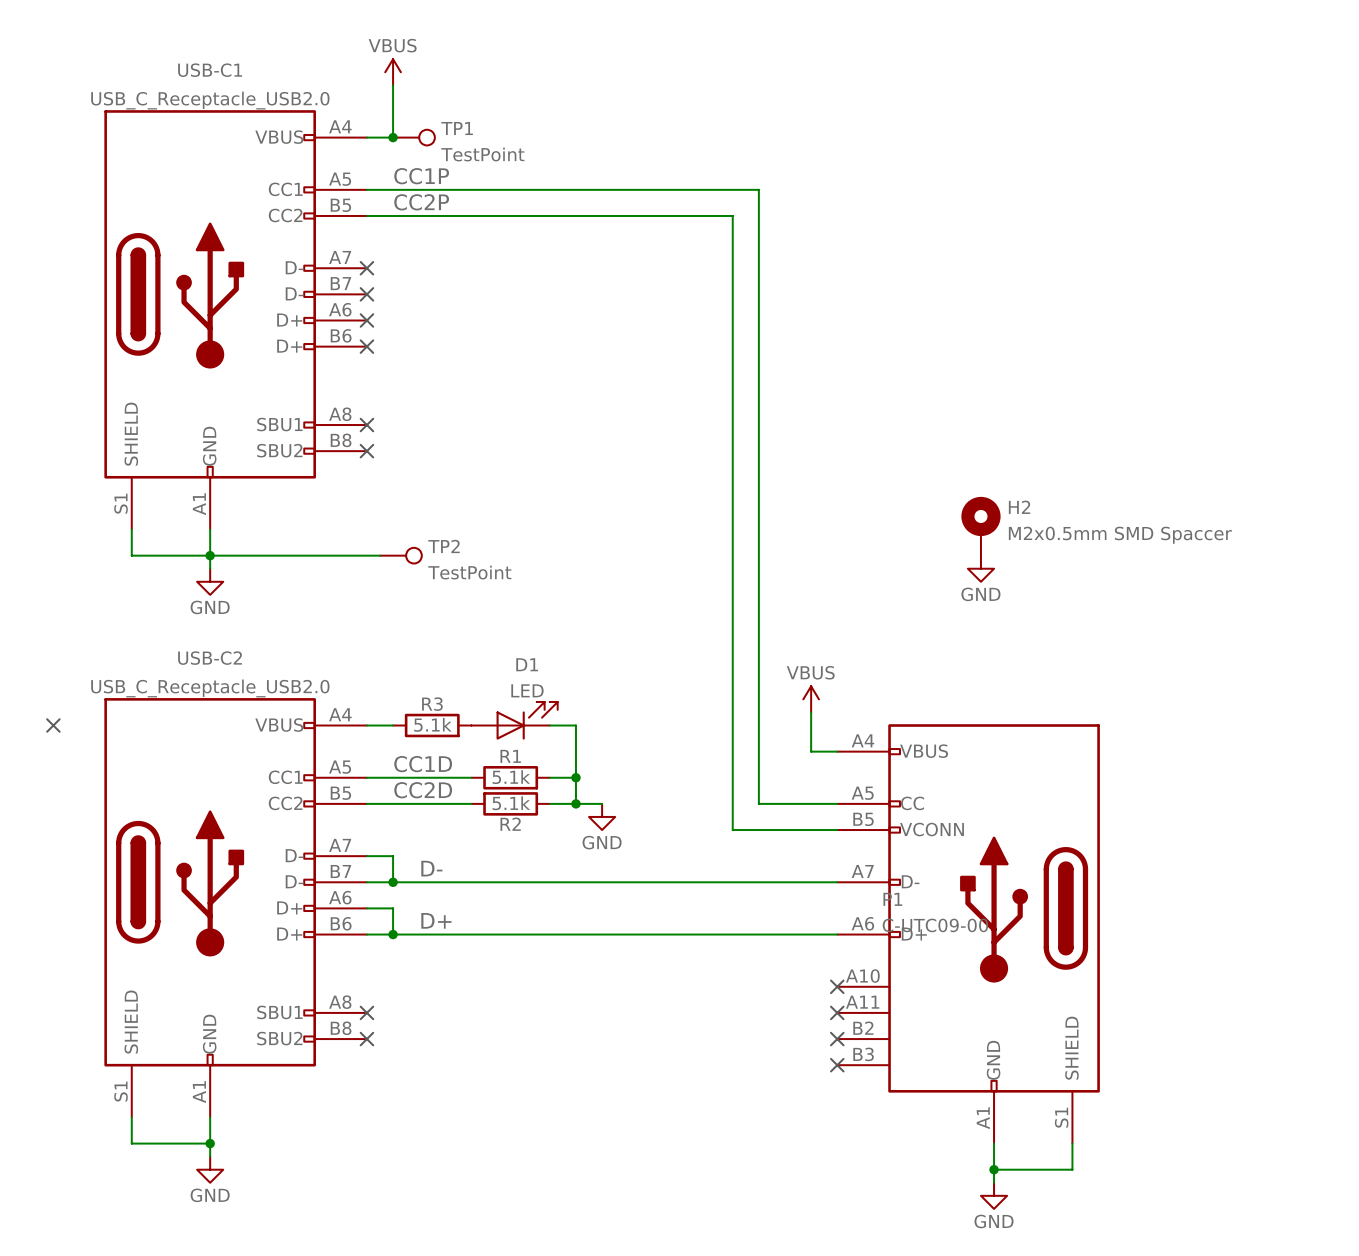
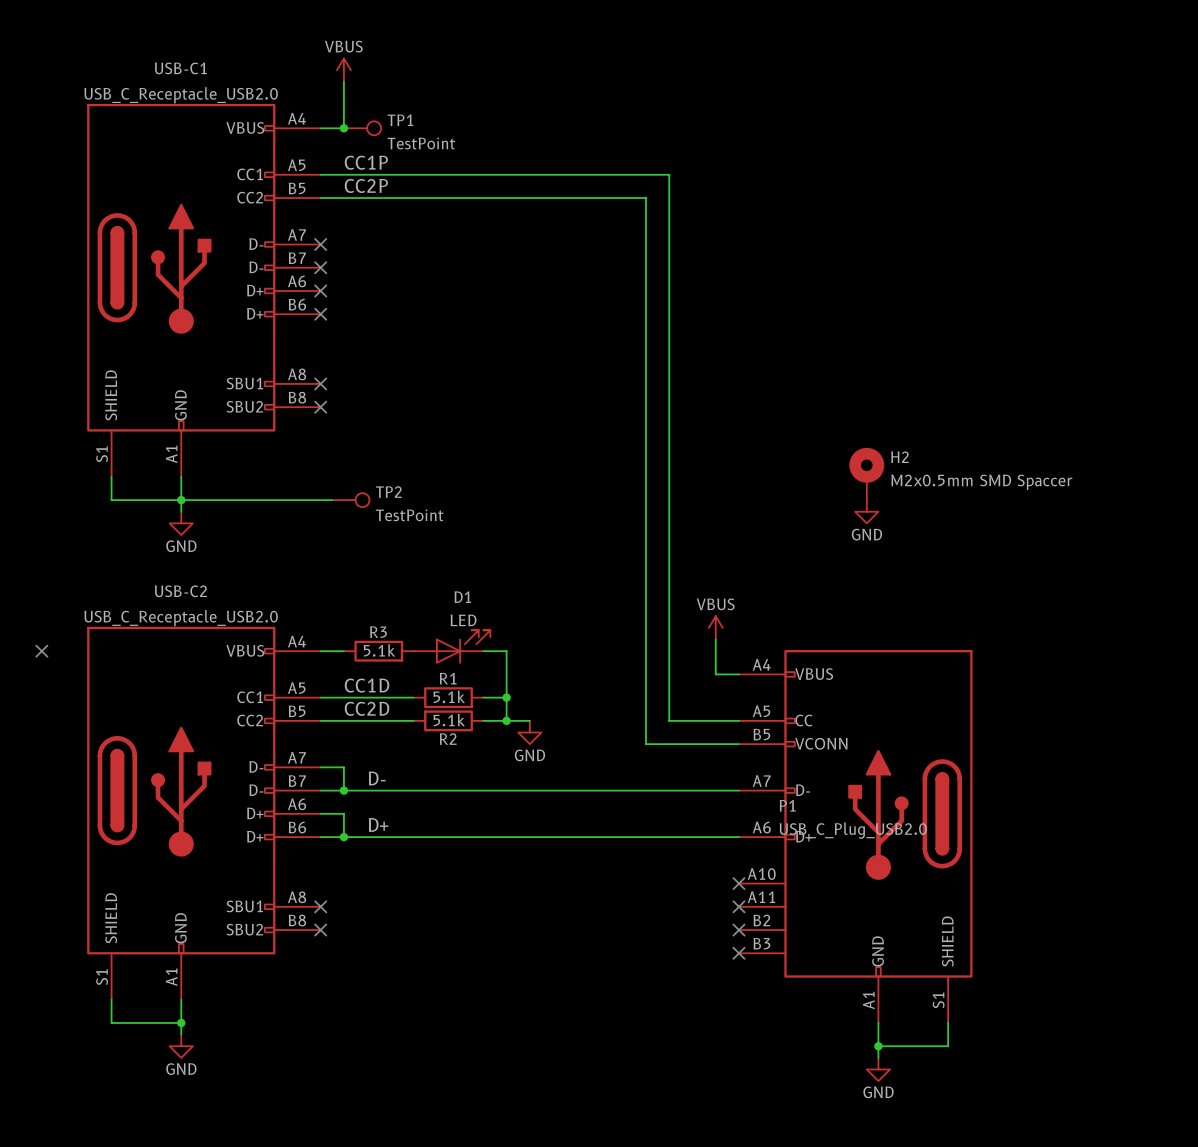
P1 value: C-UTC09-00 (935, 925) -> USB_C_Plug_USB2.0 (853, 830)

